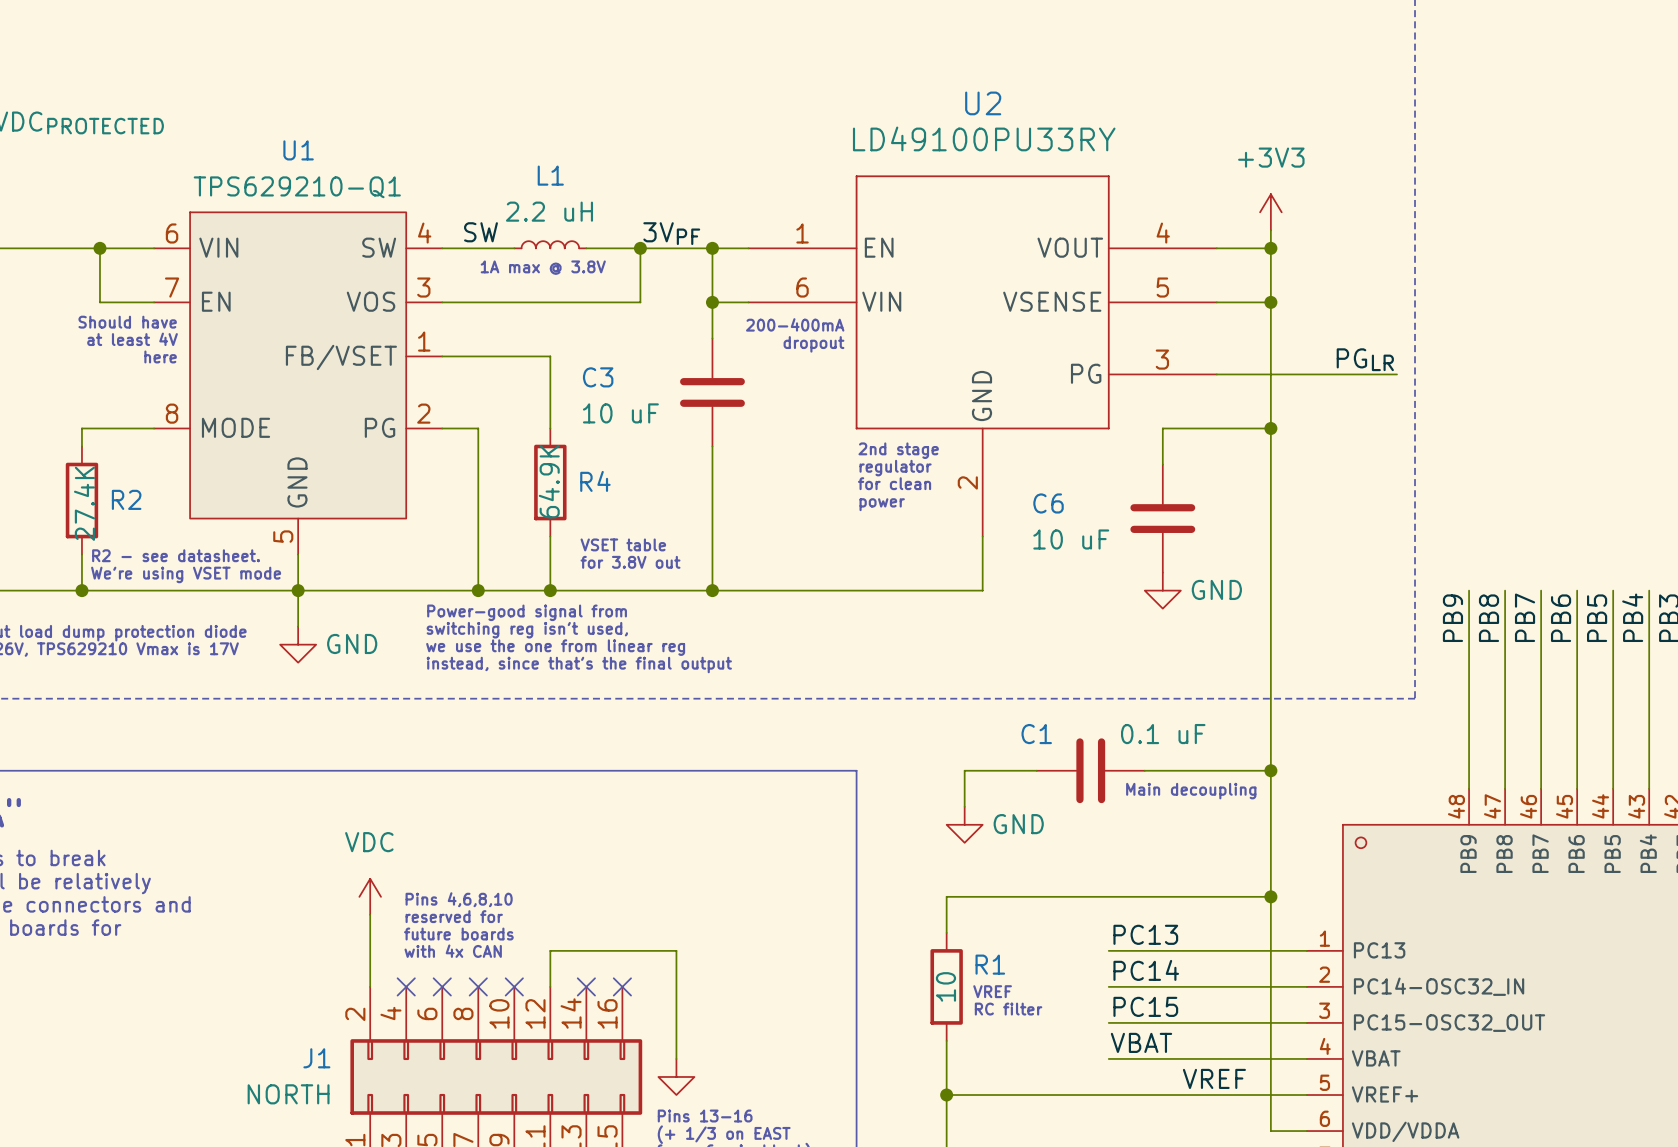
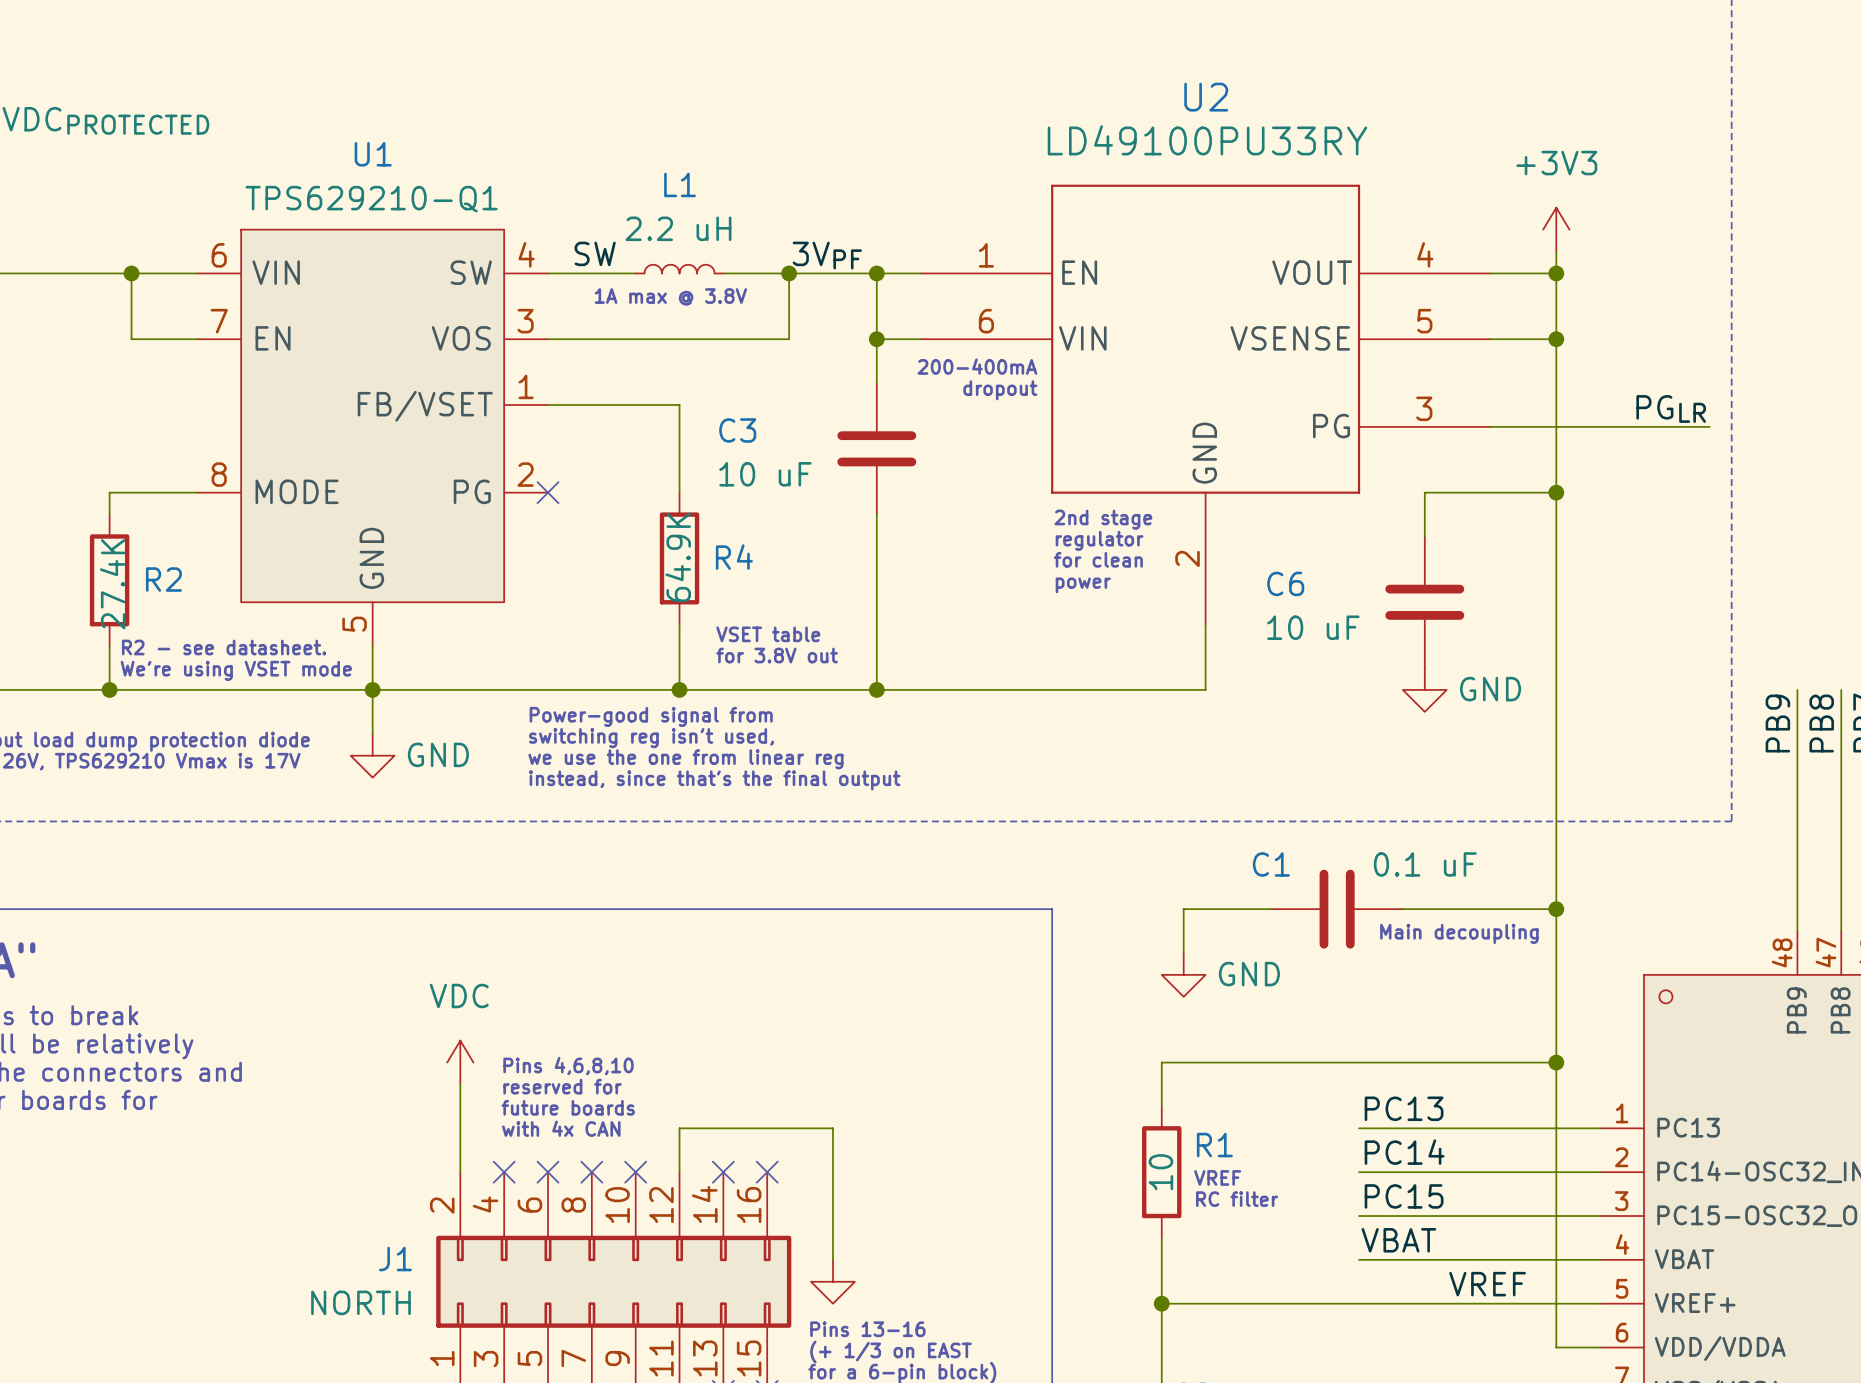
text: Should have (127, 322) -> none
text: at least 4V (132, 339) -> none
text: here (160, 356) -> none
wire: (442, 428) (478, 428) (478, 590) -> none
no-connect mark: none -> (548, 492)
junction: (478, 590) -> none

